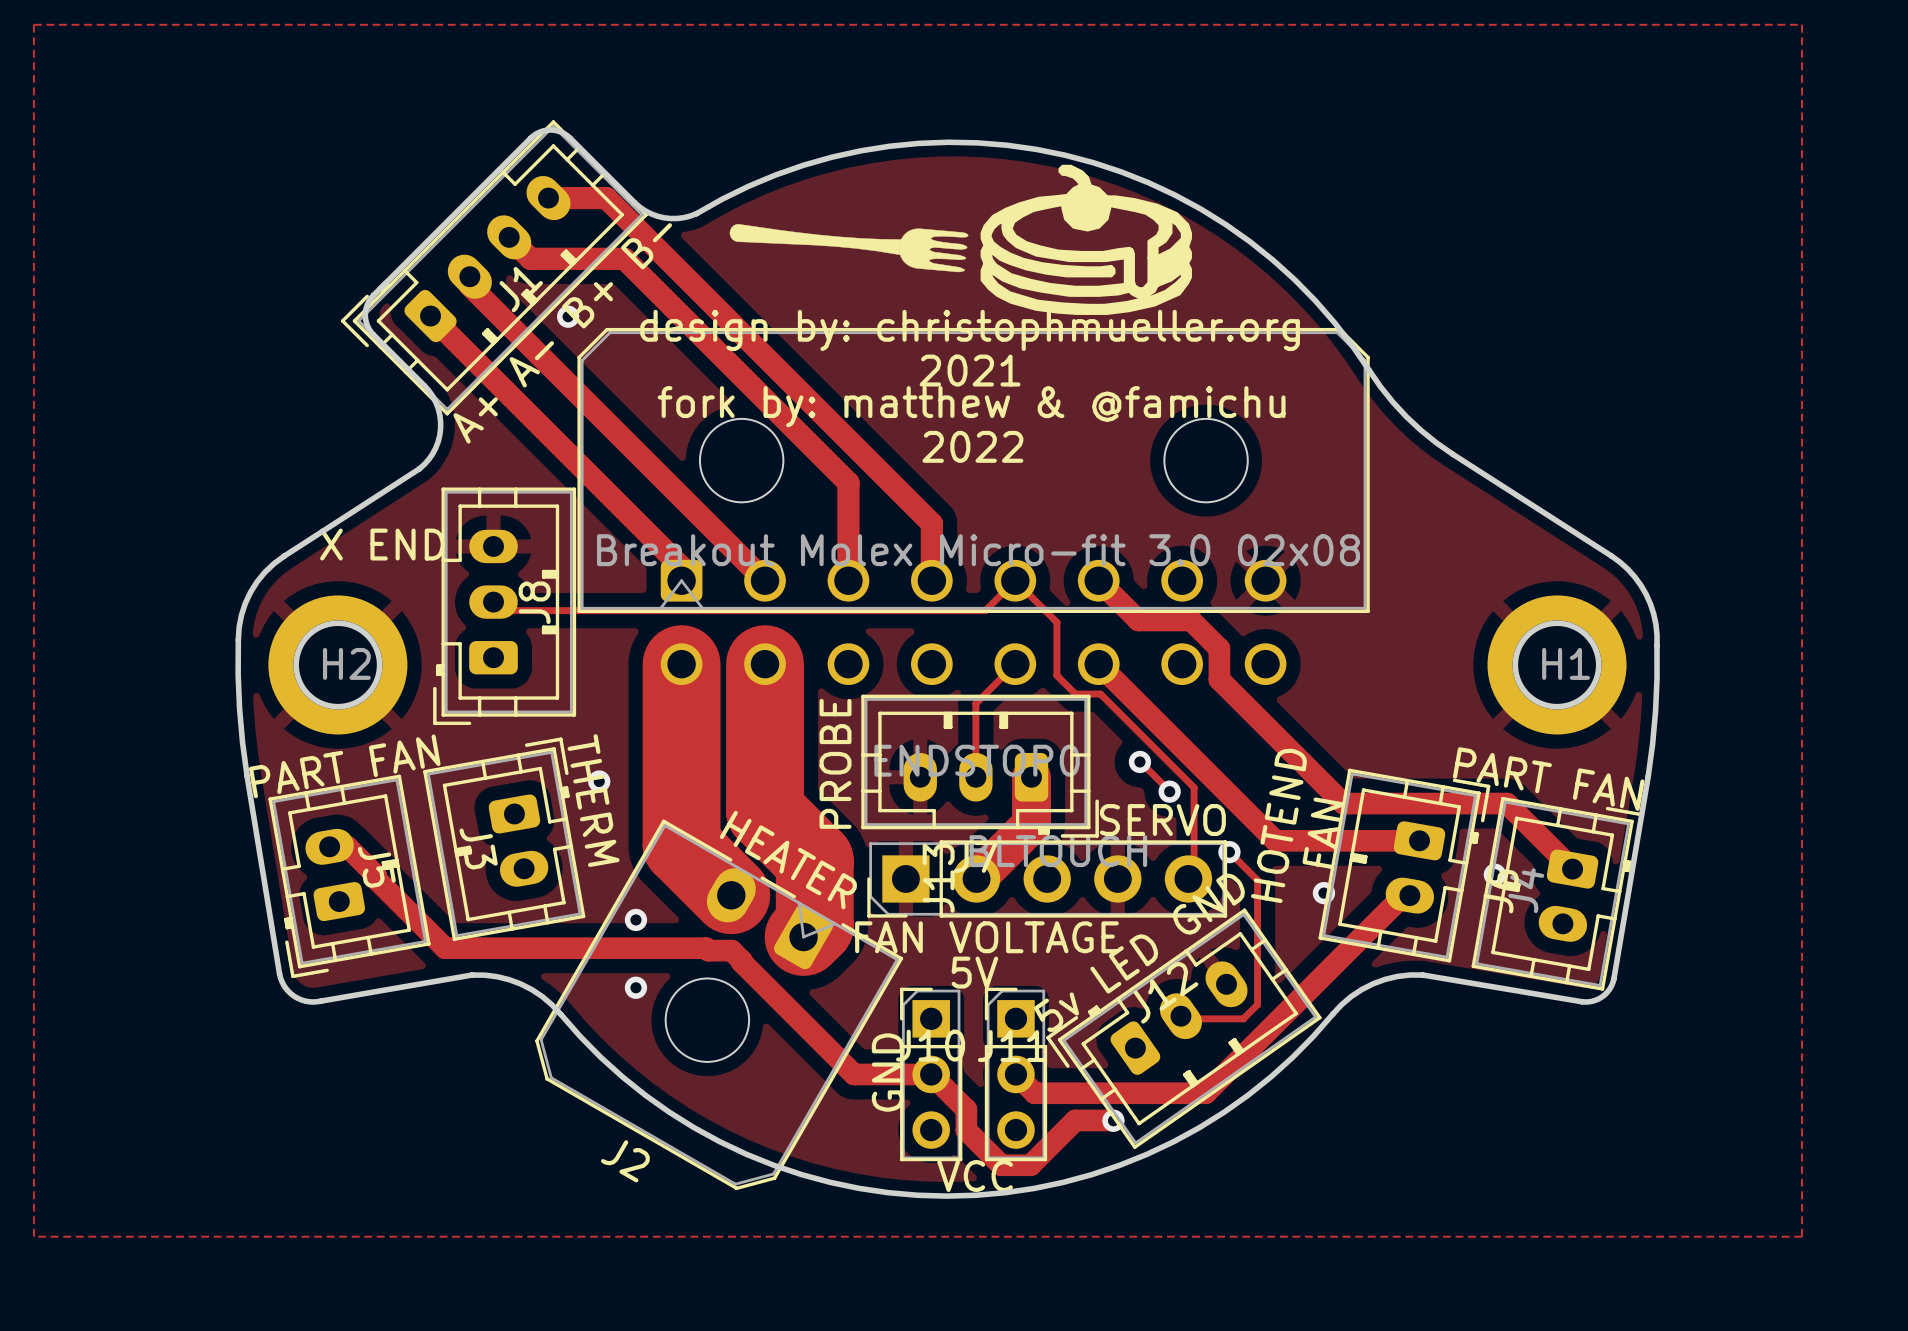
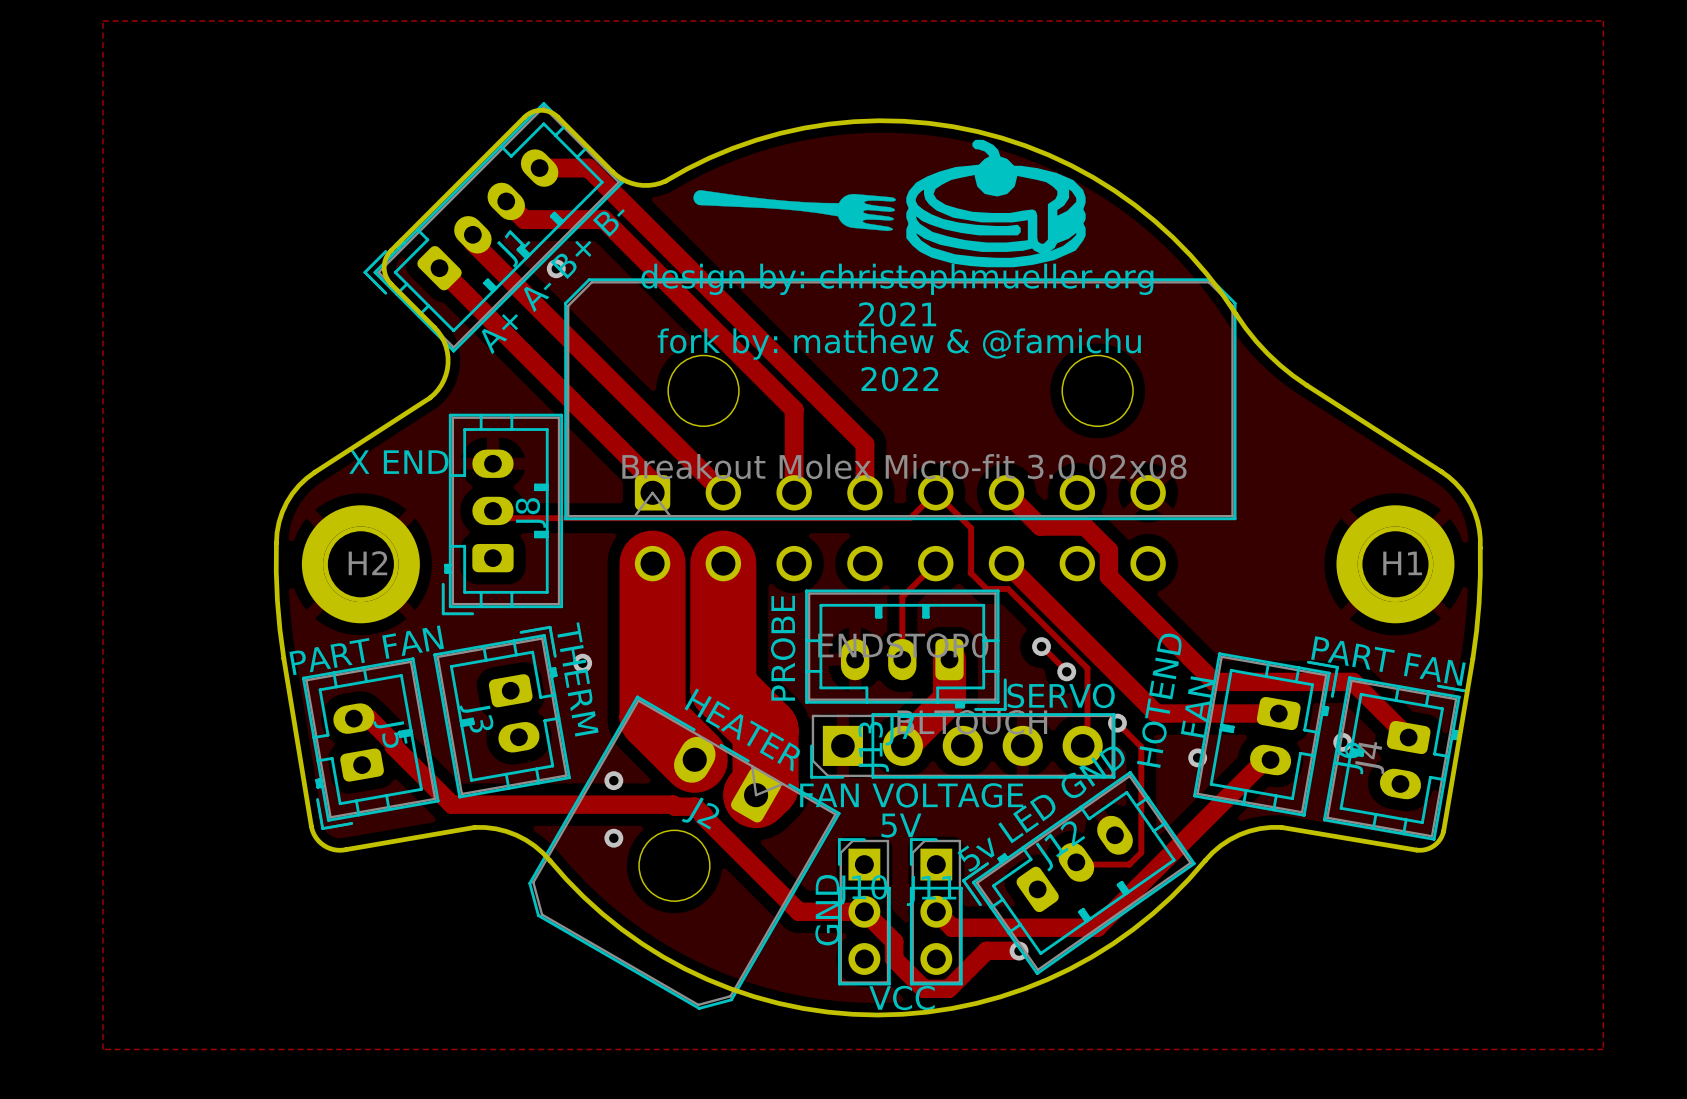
J2 name position: J2 (625, 1161) -> J2 (700, 813)

